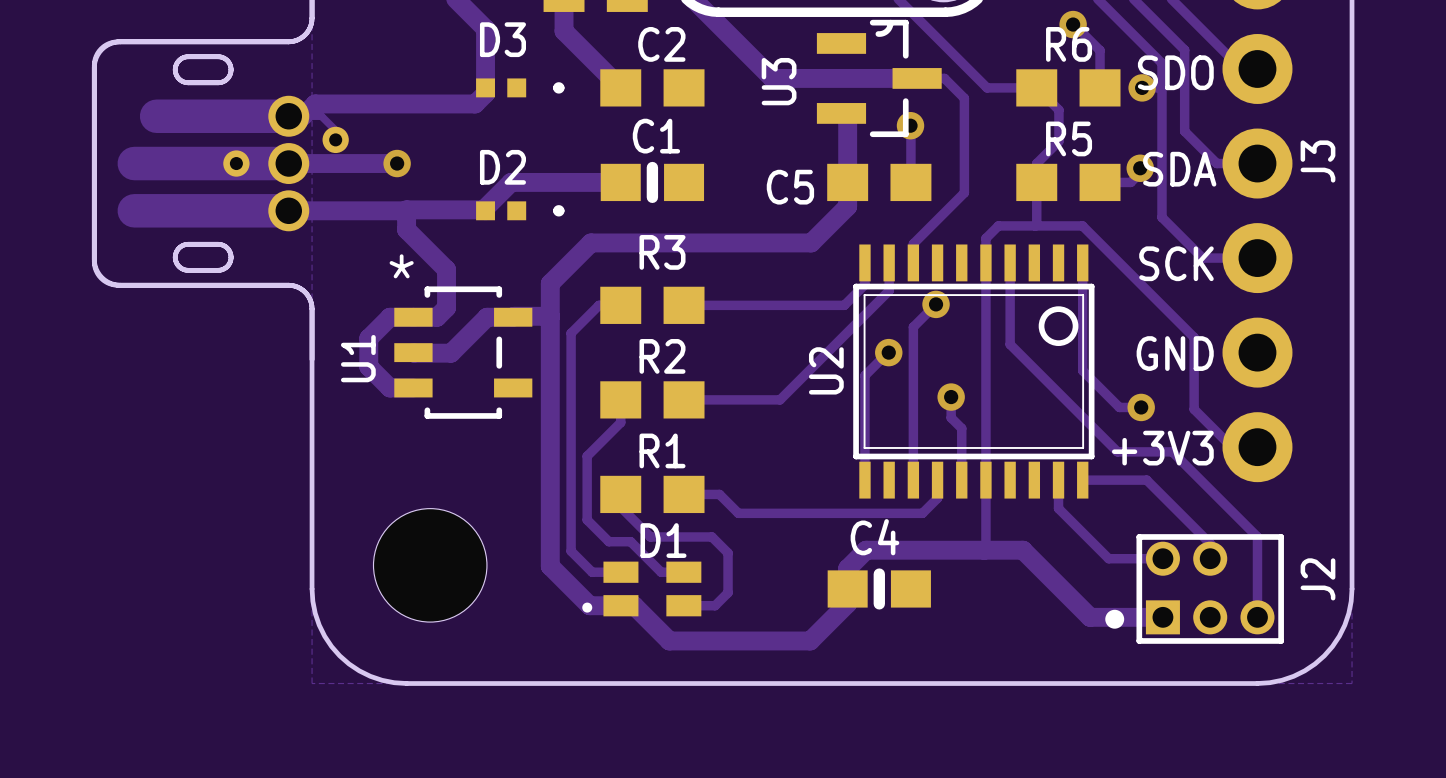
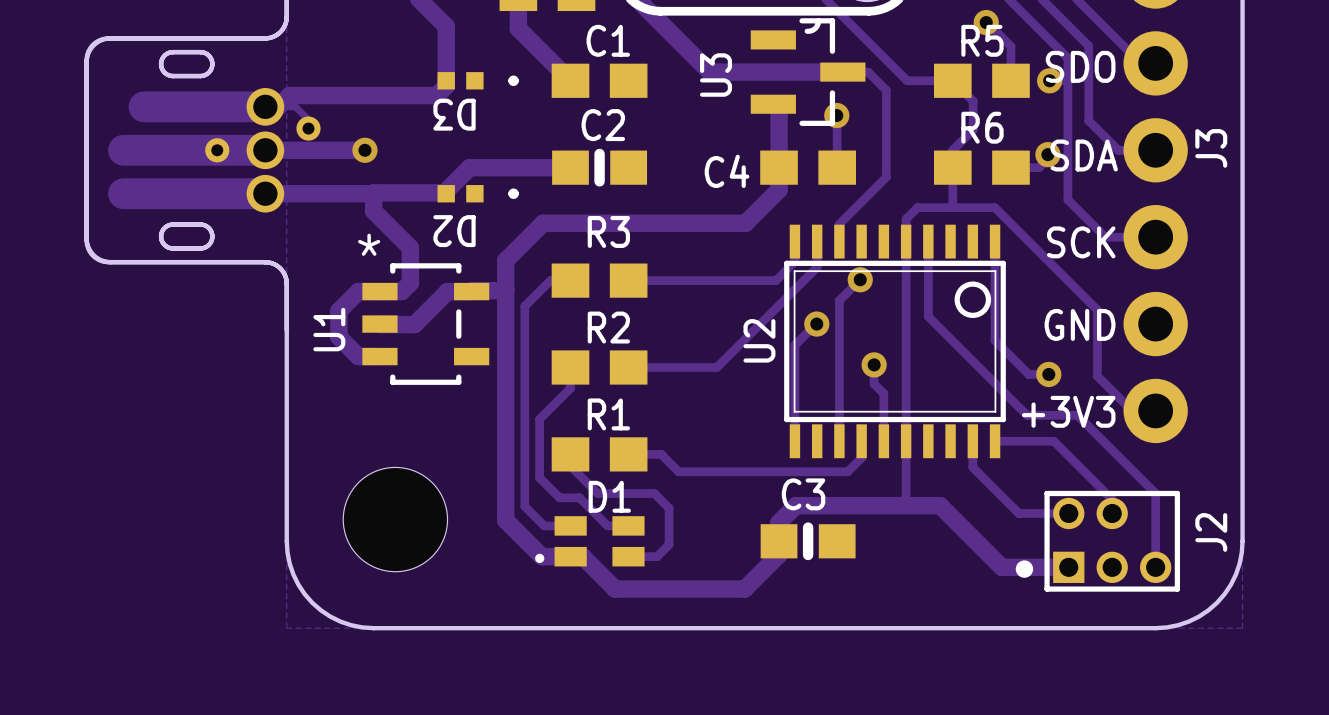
D3 name rotation: 0° (502, 39) -> 180° (454, 114)
D3 name position: D3 (502, 39) -> D3 (454, 114)
C2 name: C2 (661, 44) -> C1 (608, 40)
R6 name: R6 (1069, 44) -> R5 (982, 40)
C1 name: C1 (656, 136) -> C2 (603, 125)
R5 name: R5 (1069, 138) -> R6 (982, 127)
D2 name rotation: 0° (502, 167) -> 180° (454, 231)
D2 name position: D2 (502, 167) -> D2 (454, 231)
C5 name: C5 (790, 187) -> C4 (727, 171)
C4 name: C4 (874, 537) -> C3 (803, 494)

